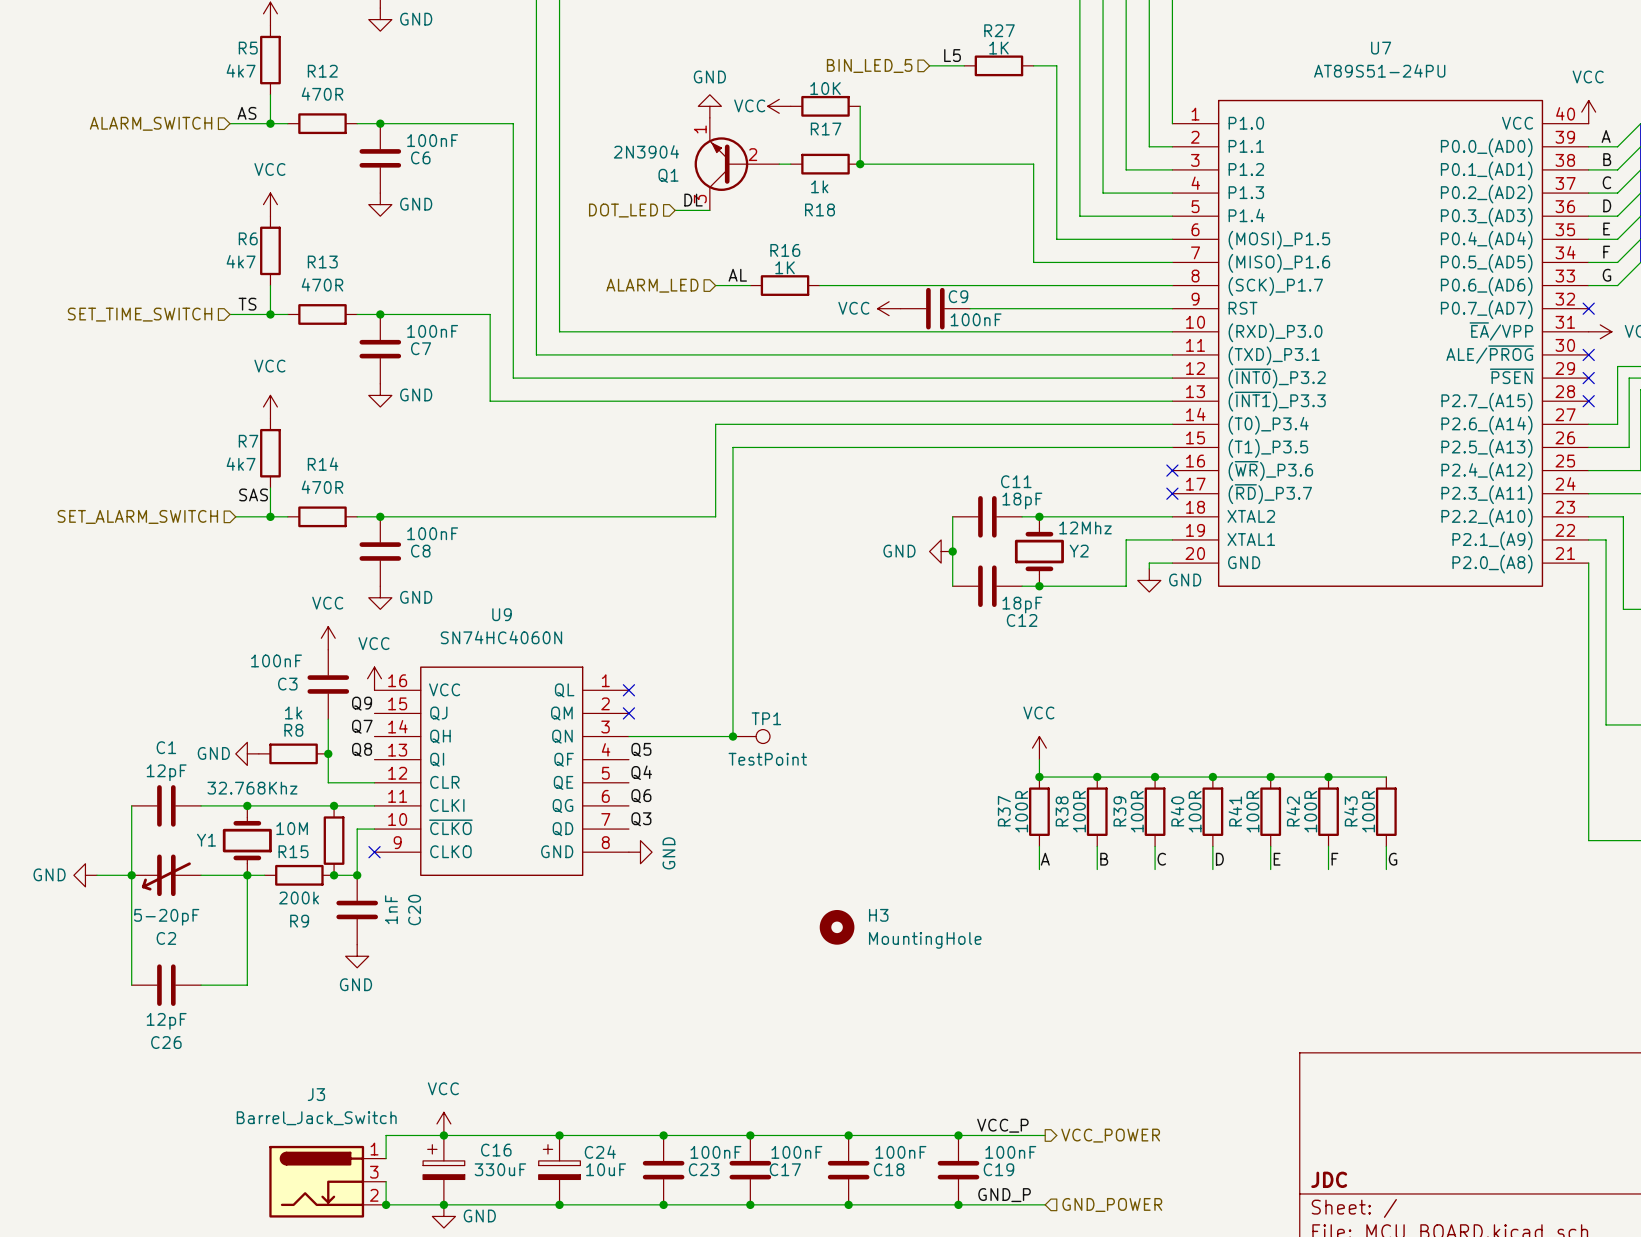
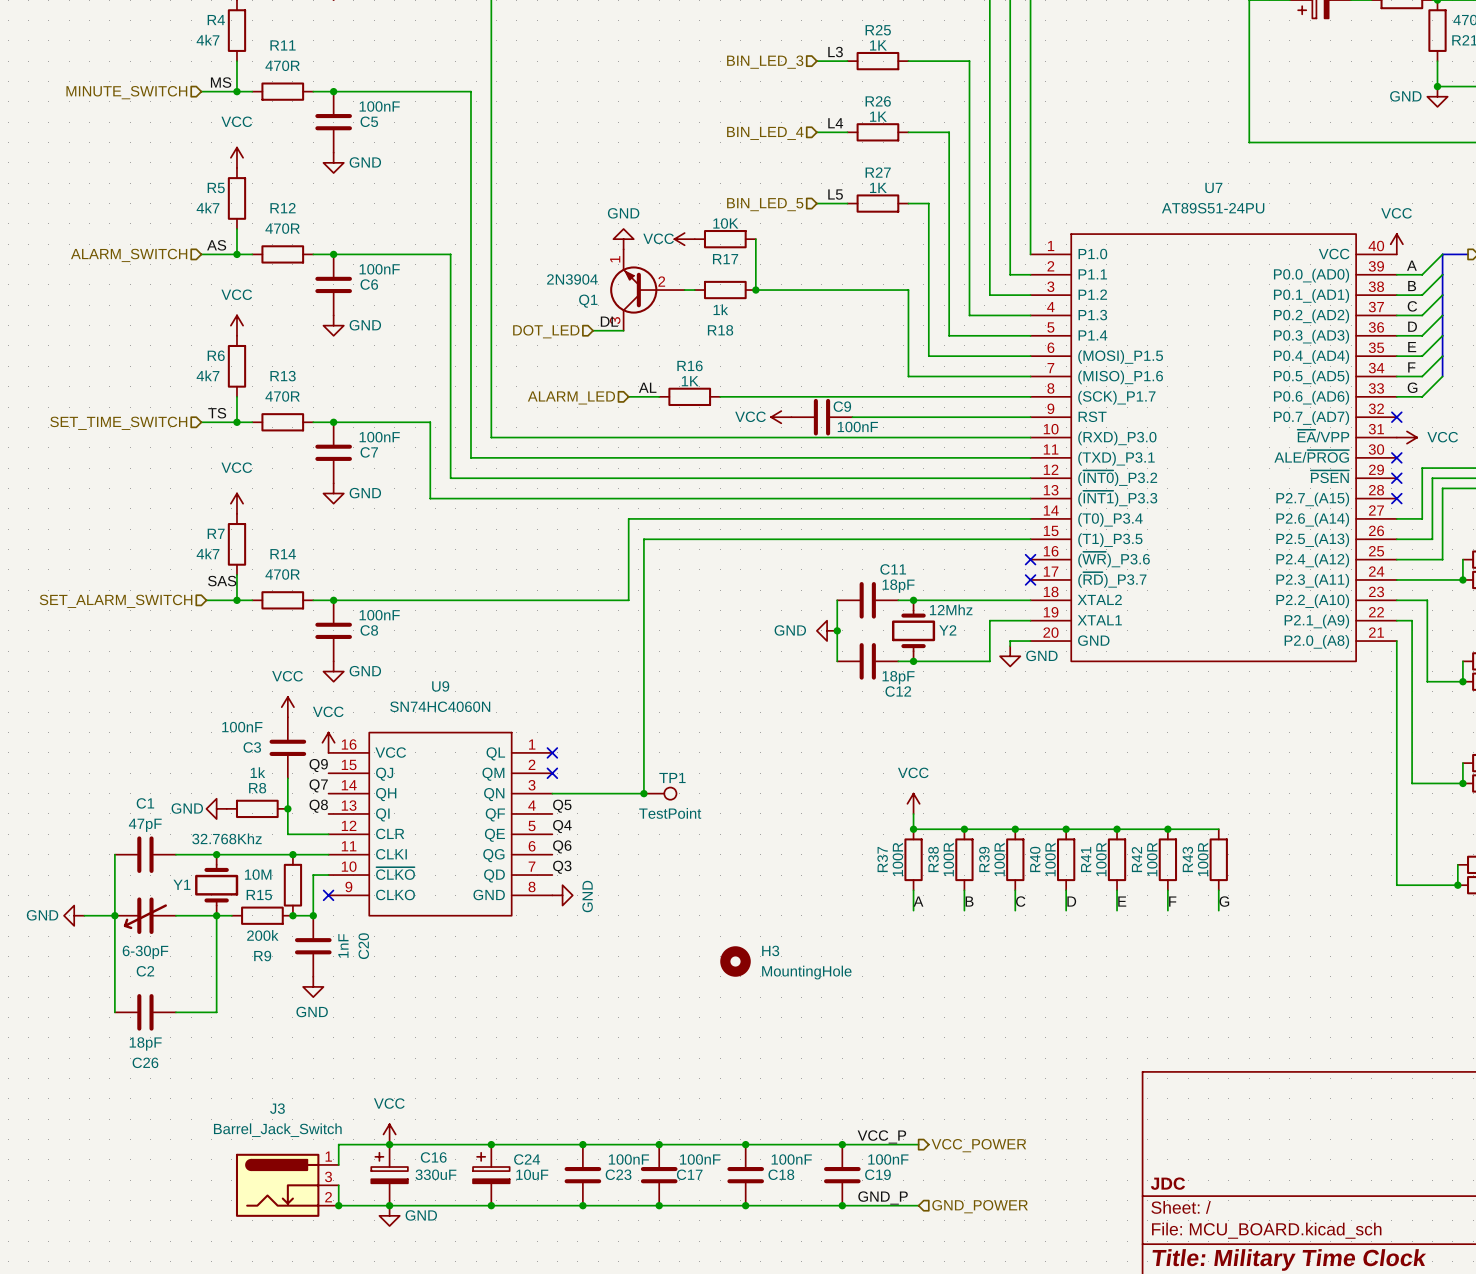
C1 value: 12pF (166, 772) -> 47pF (145, 825)
C2 value: 5-20pF (166, 917) -> 6-30pF (145, 952)
C26 value: 12pF (166, 1021) -> 18pF (145, 1043)

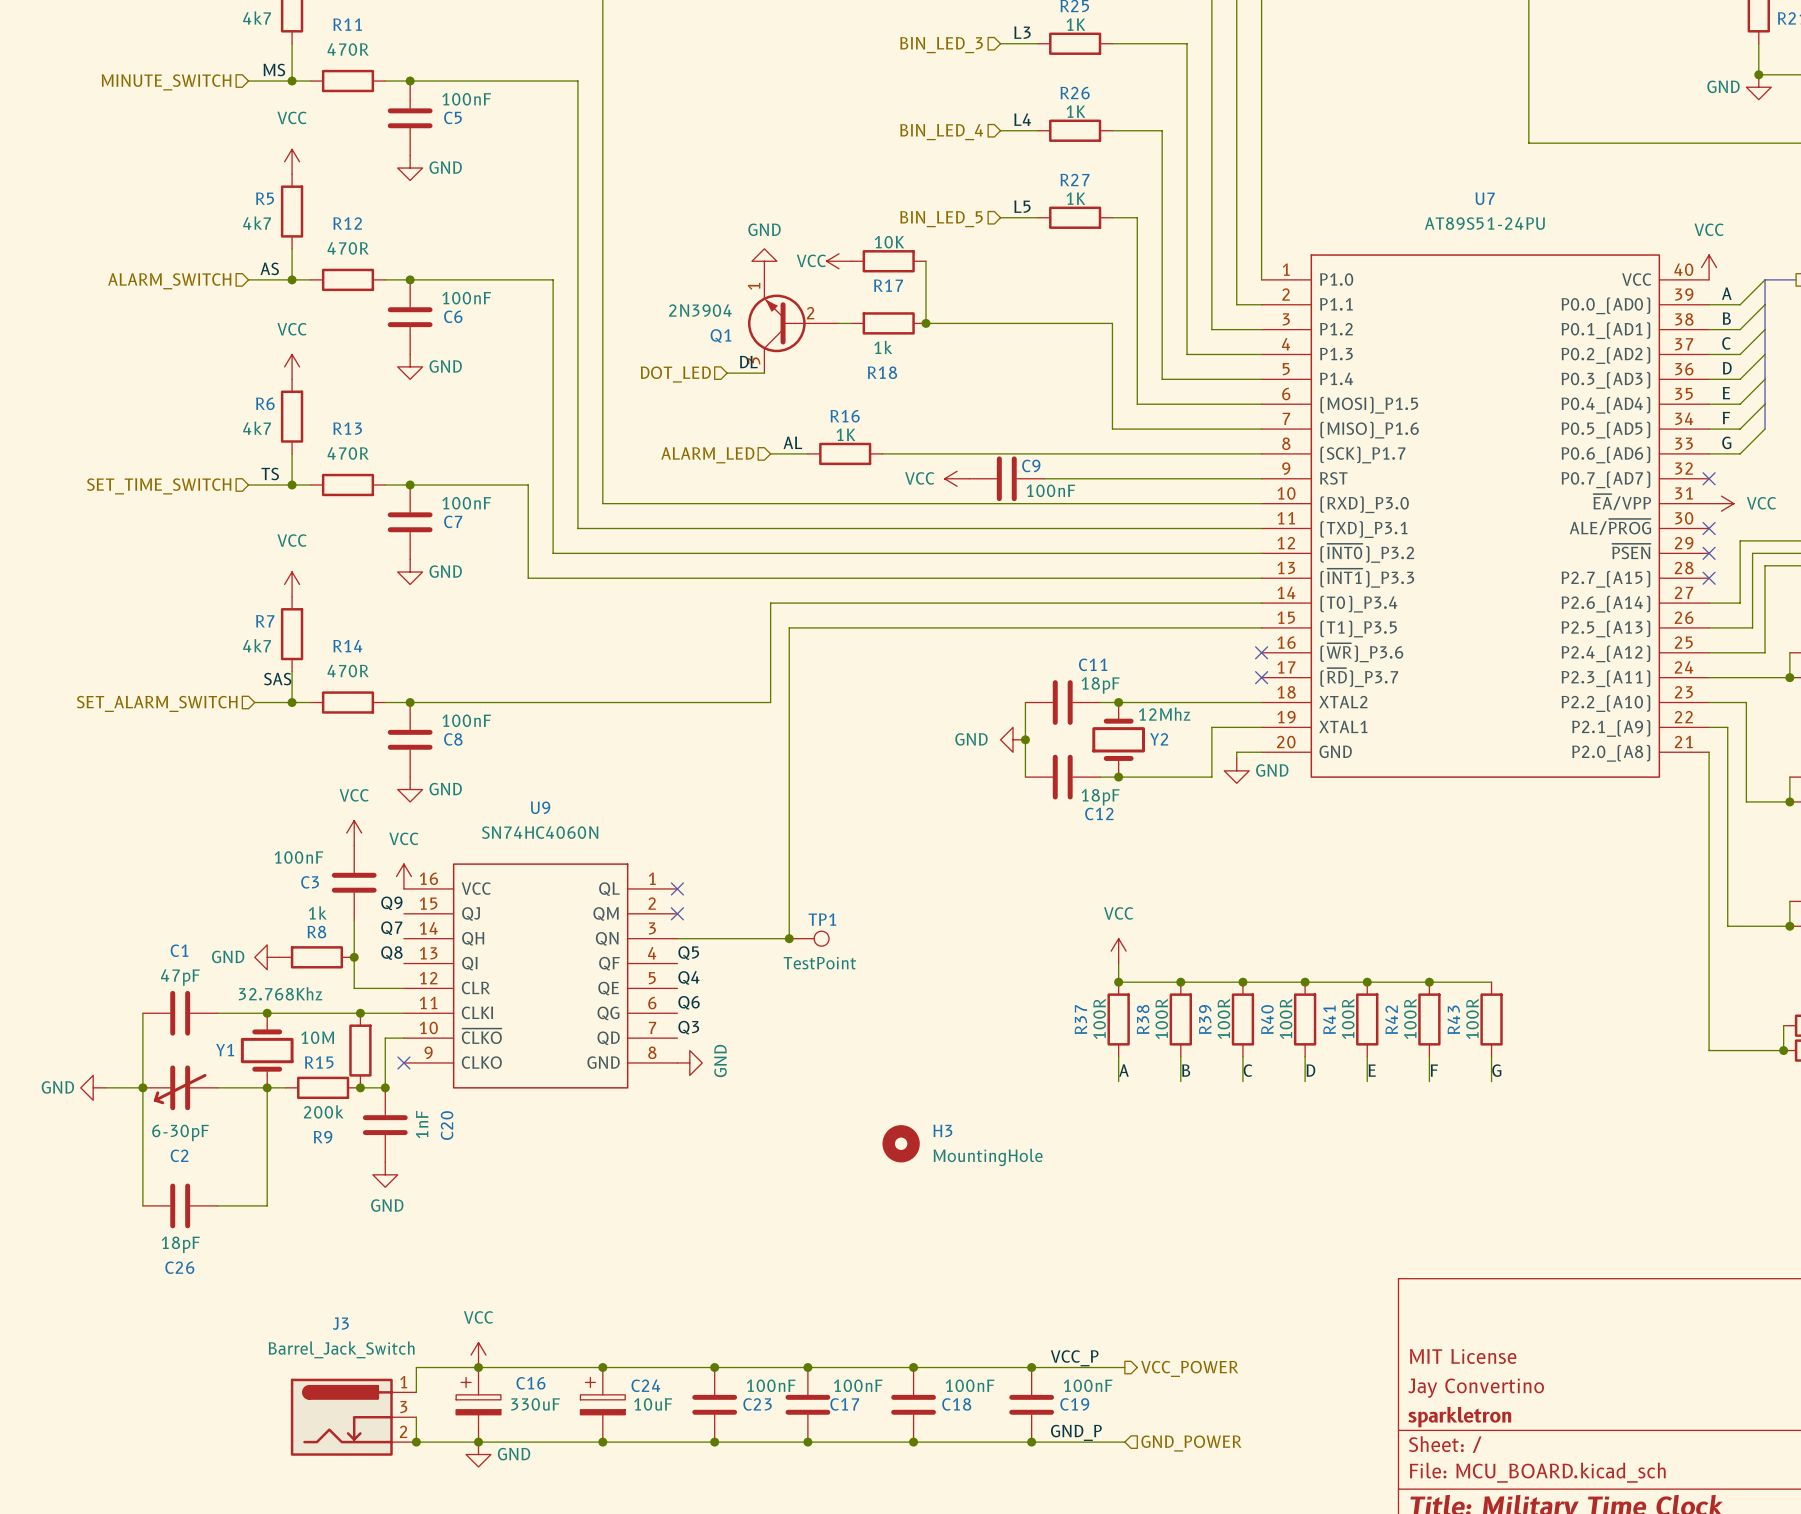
title block: none -> MIT License (1463, 1356)
title block: none -> Jay Convertino (1476, 1388)
title block: JDC (1167, 1183) -> sparkletron (1459, 1417)

